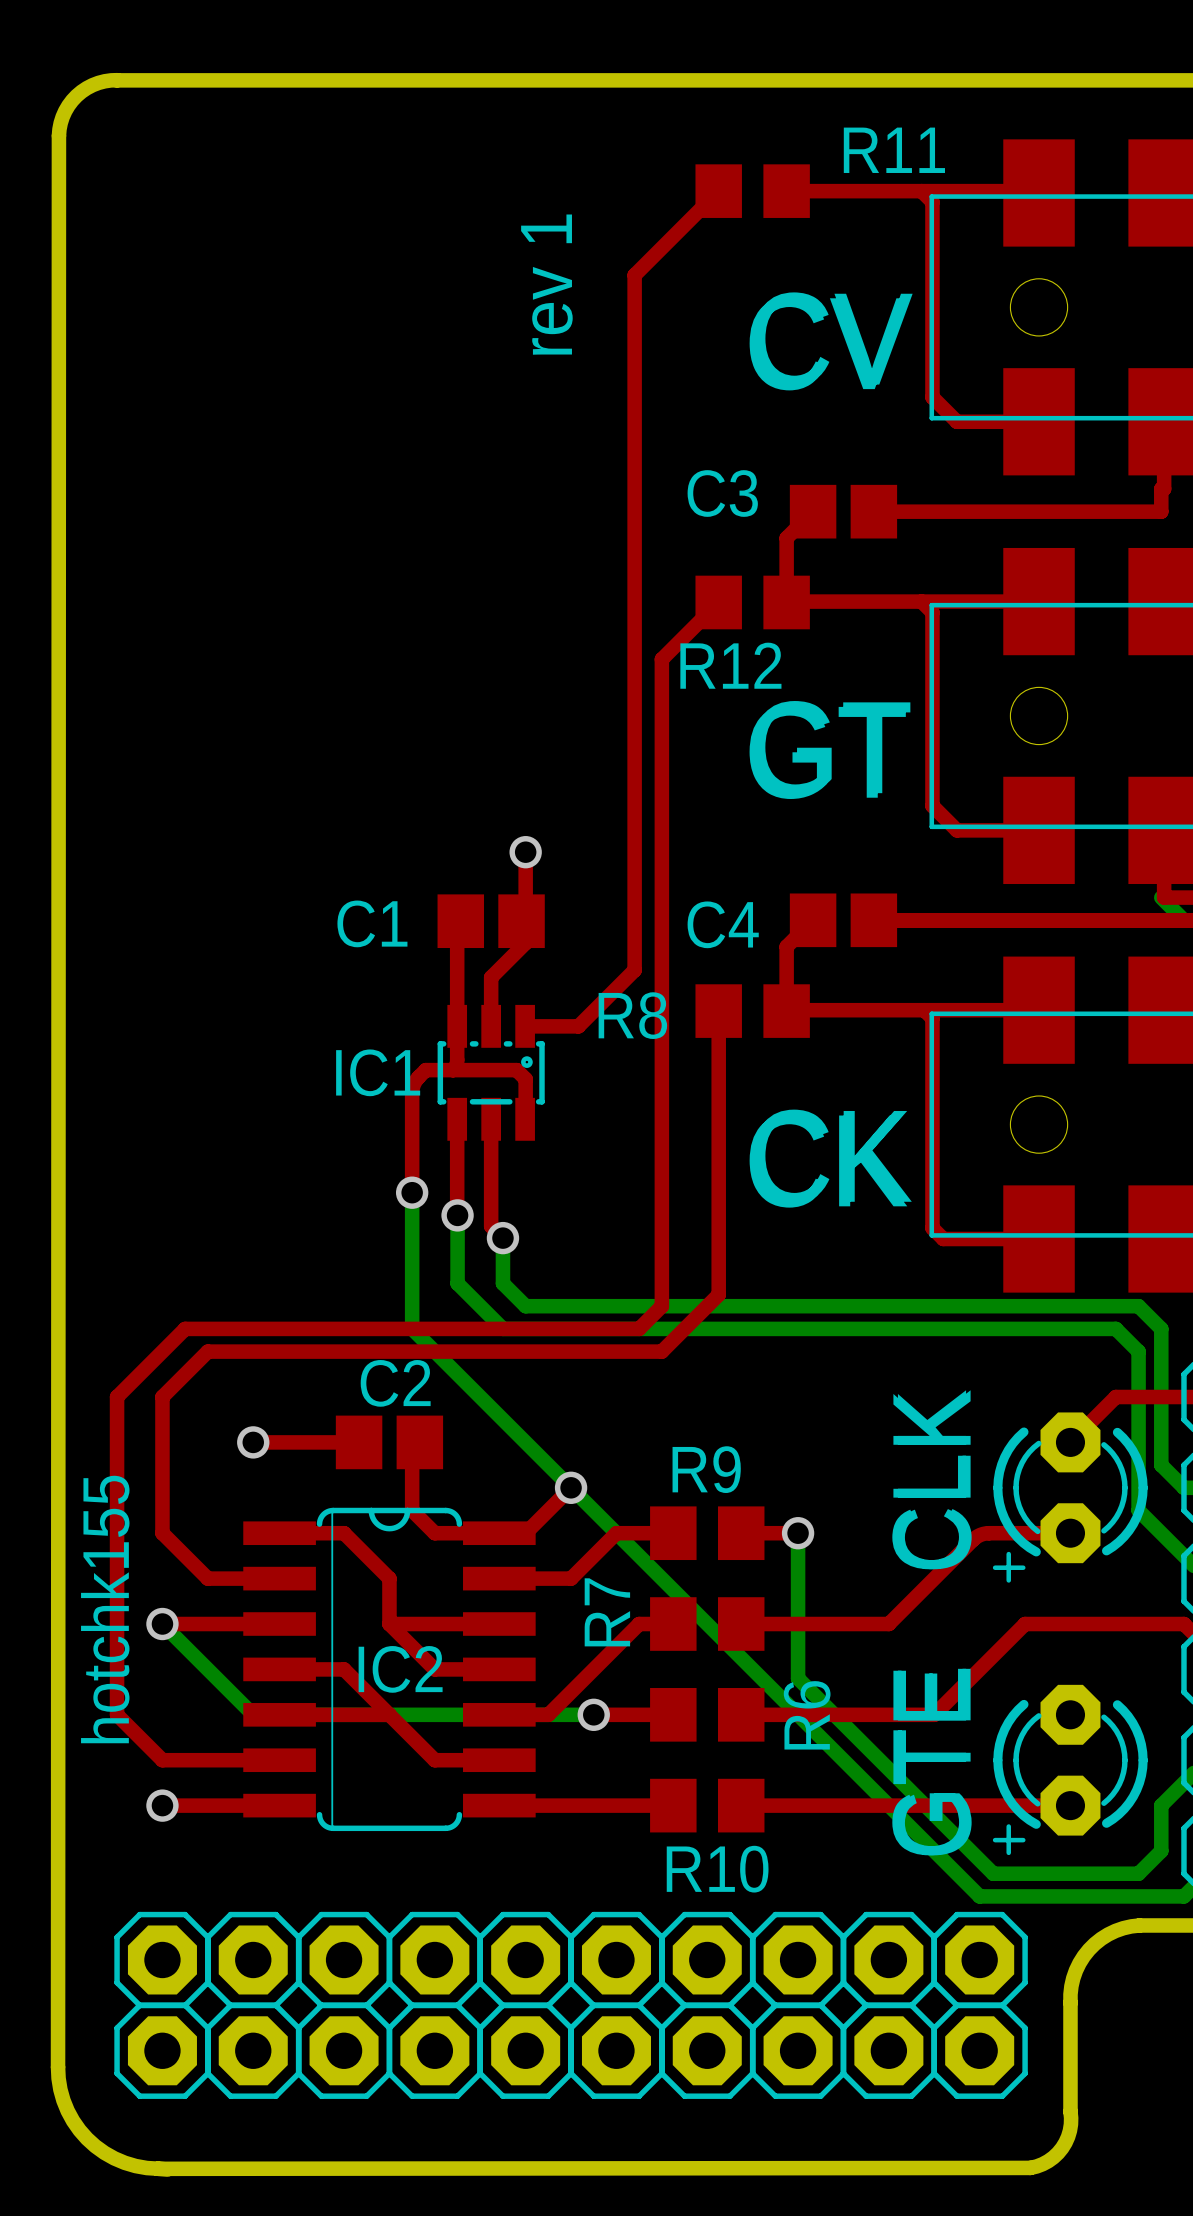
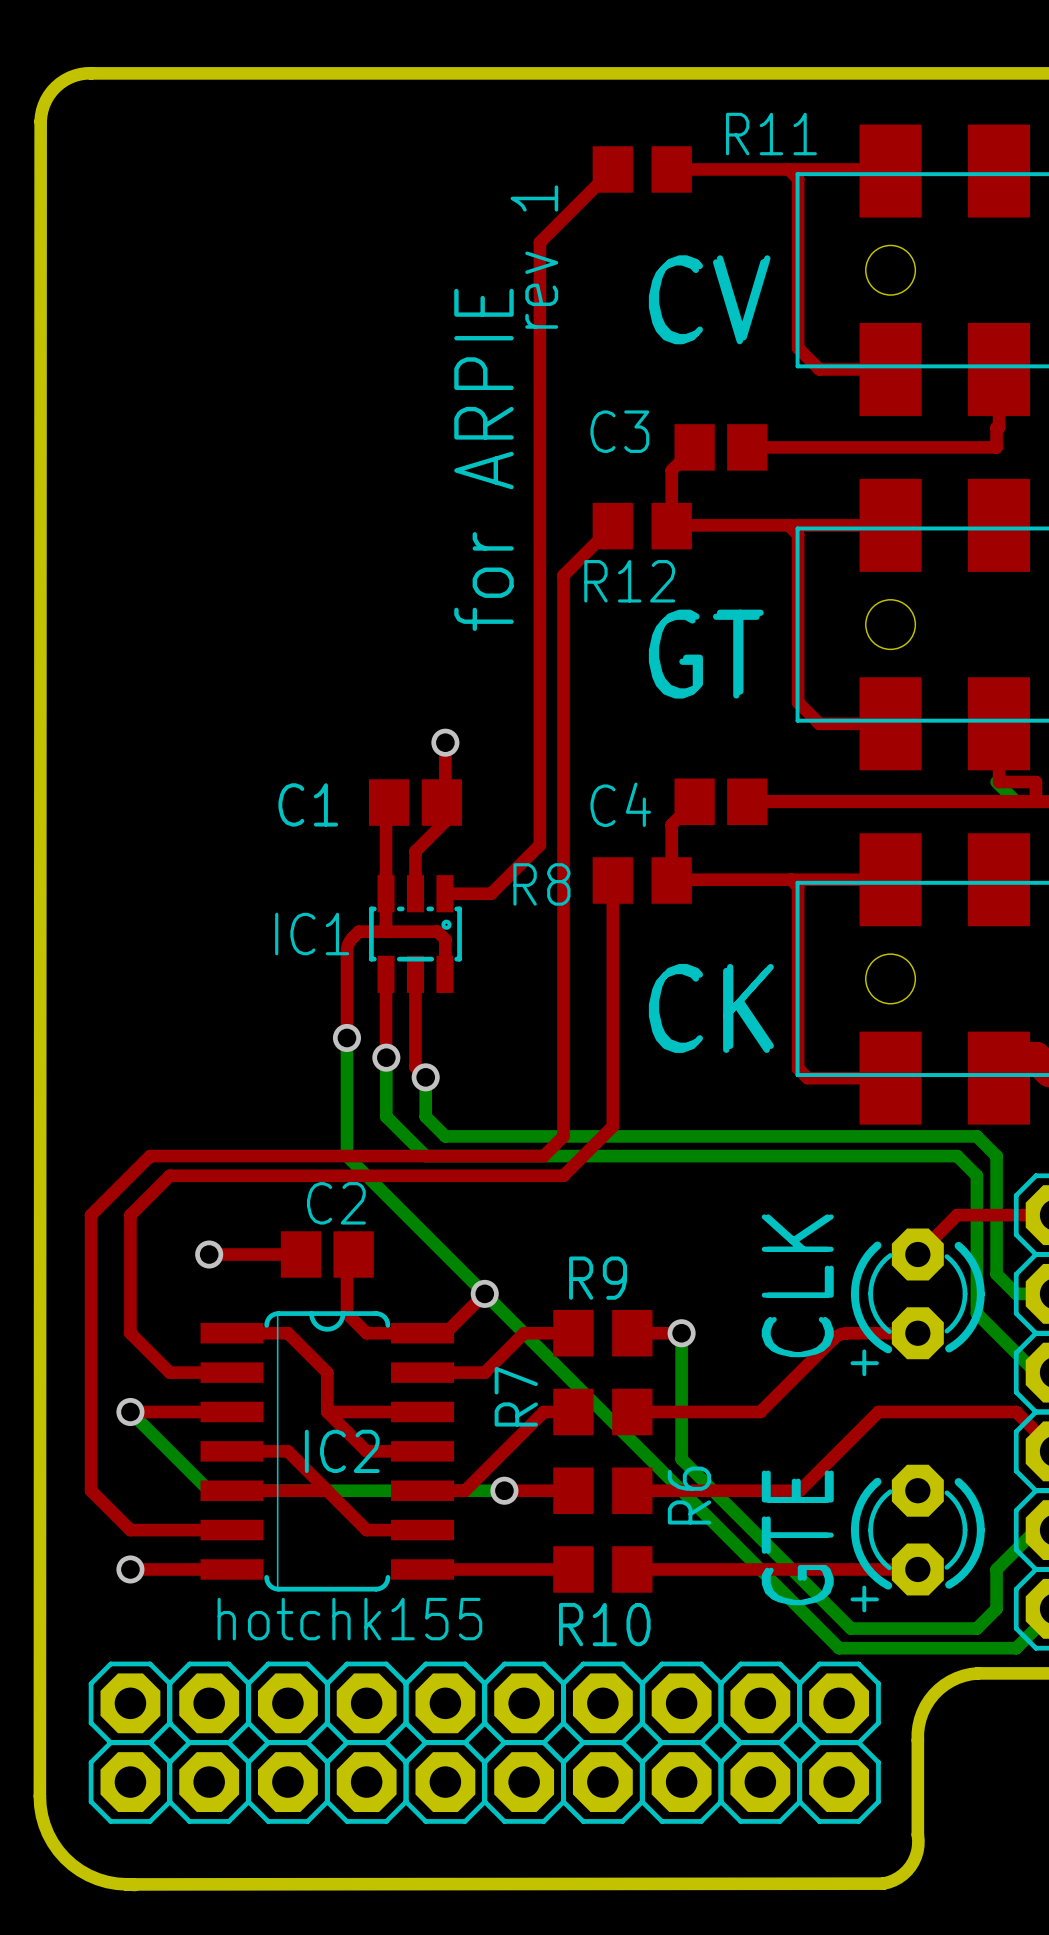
text position: rev 1 (546, 284) -> rev 1 (534, 257)
text: none -> for ARPIE (483, 459)
text rotation: 0° (105, 1609) -> 90° clockwise (349, 1619)

